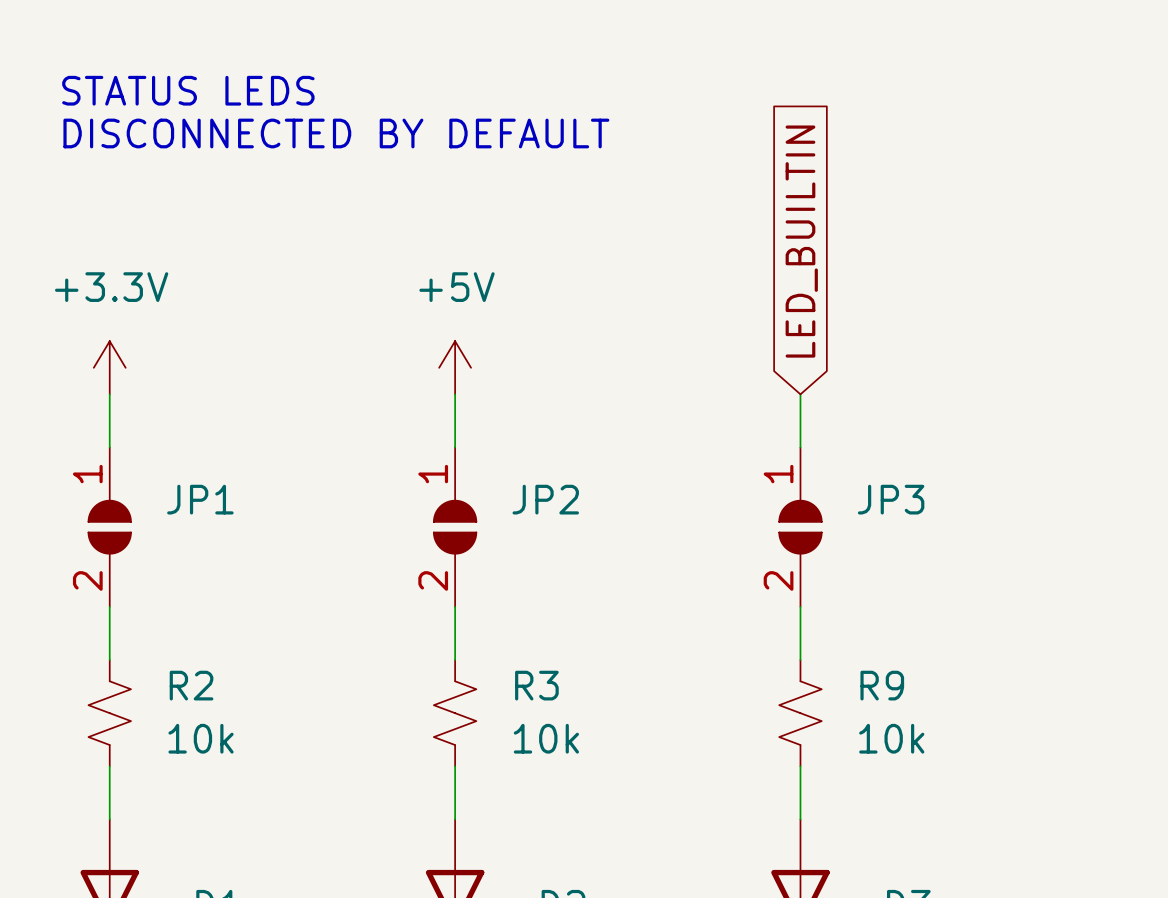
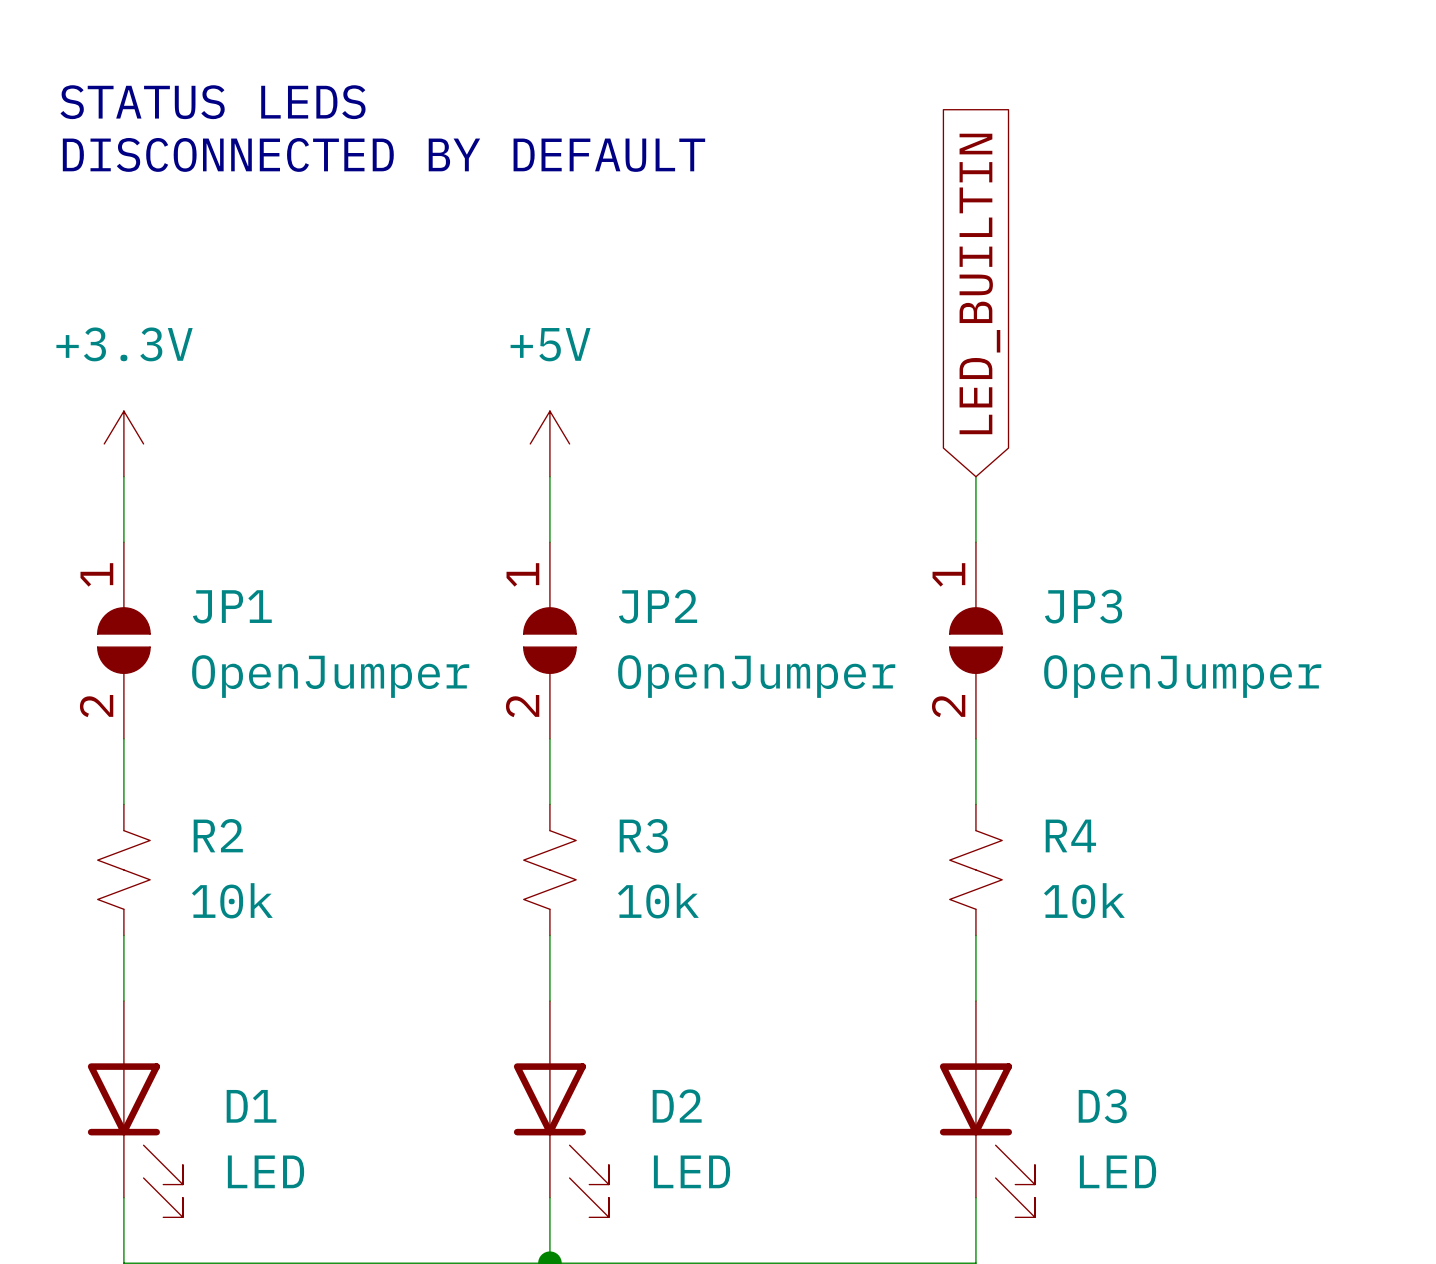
JP1 value: none -> OpenJumper (330, 676)
JP2 value: none -> OpenJumper (756, 676)
JP3 value: none -> OpenJumper (1182, 676)
R9 name: R9 (882, 685) -> R4 (1070, 835)

